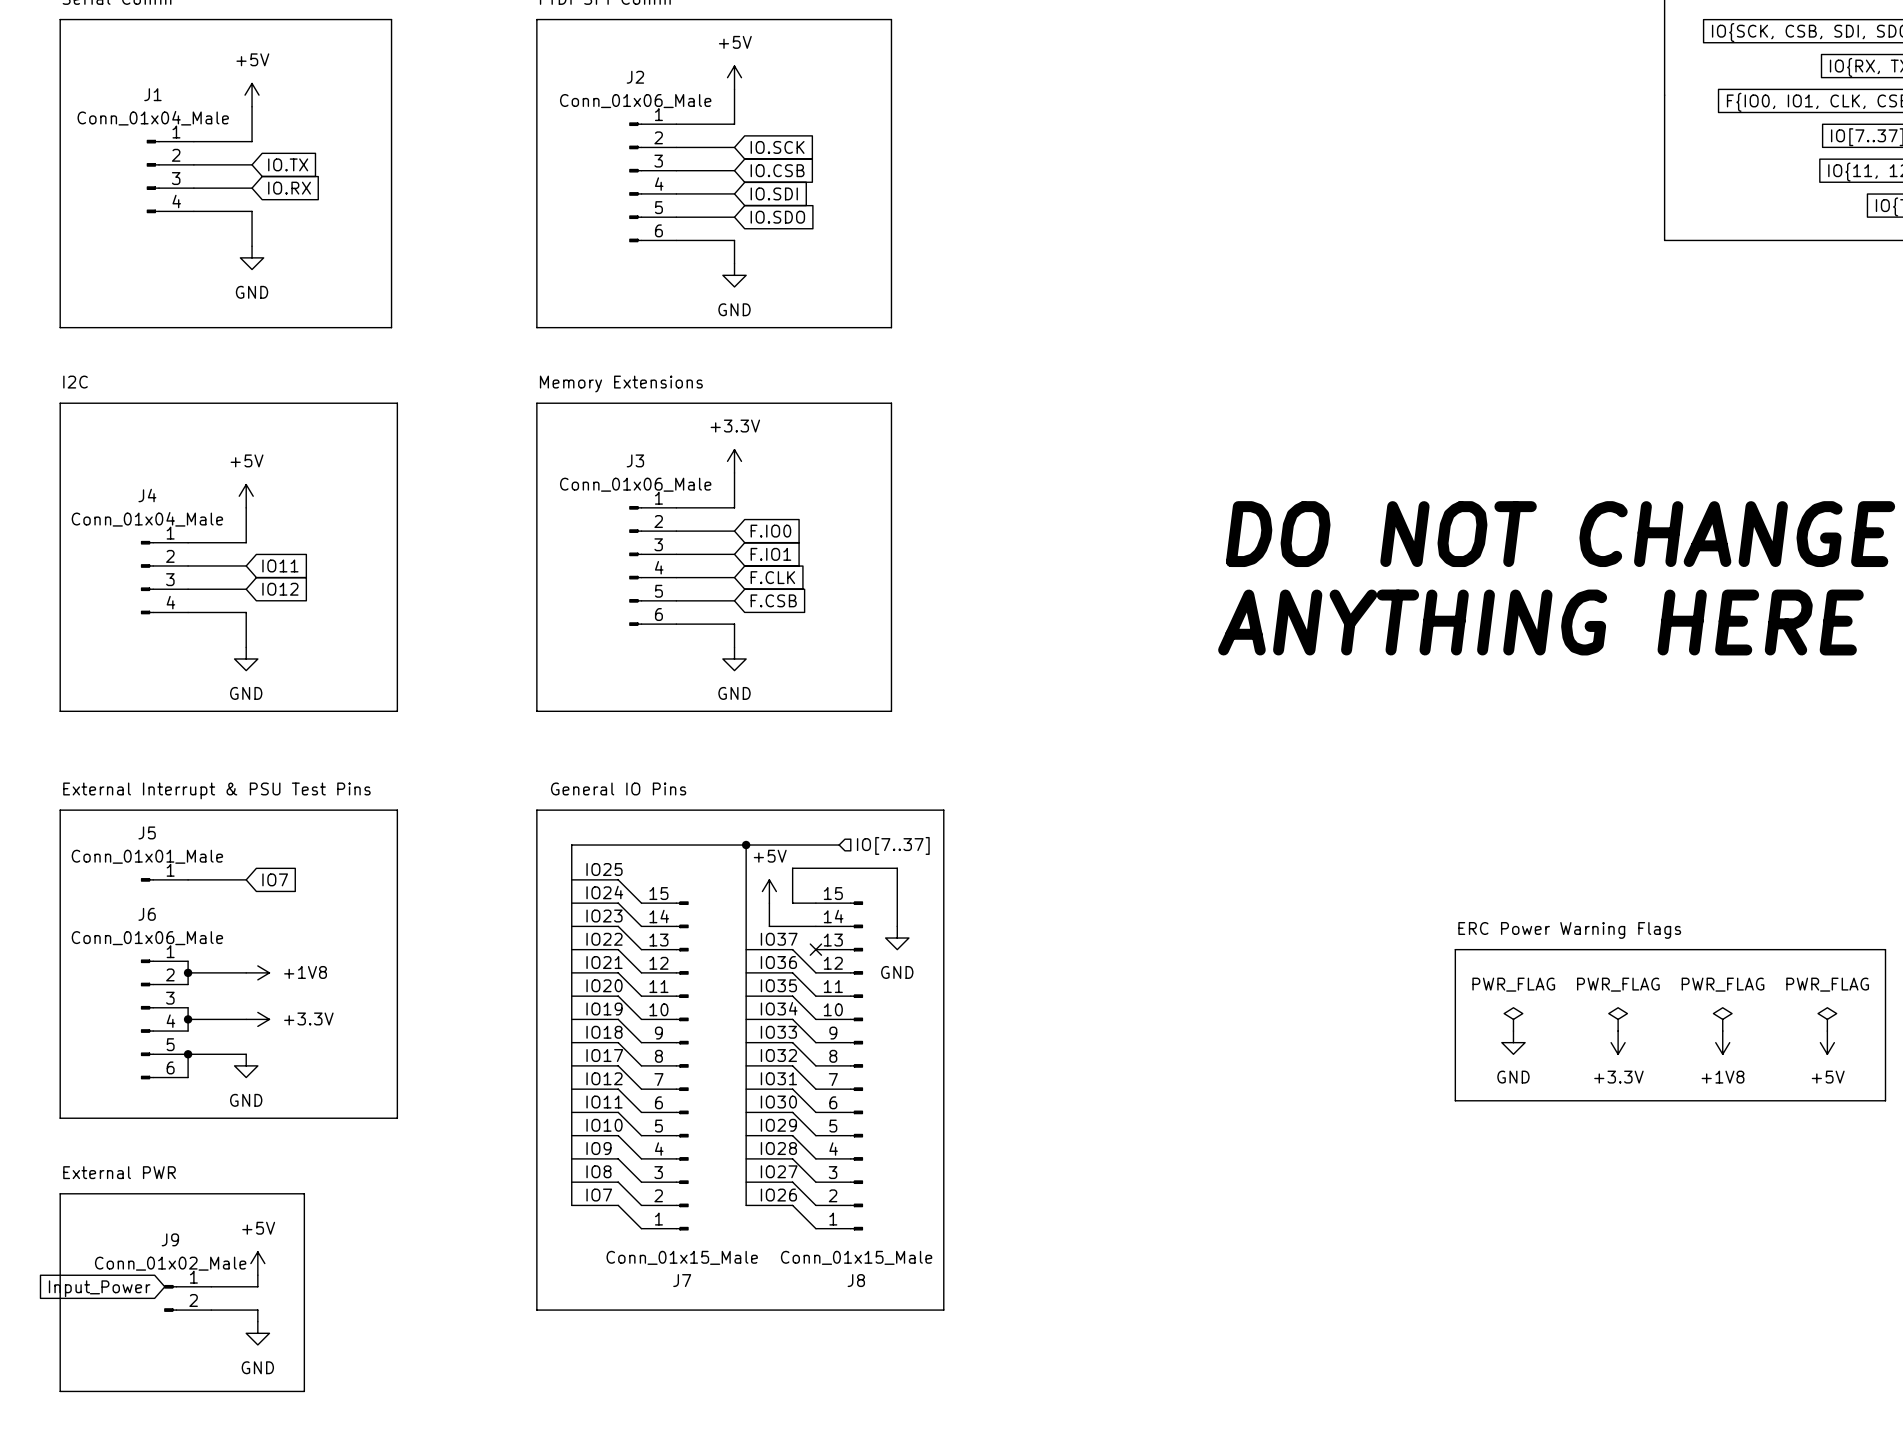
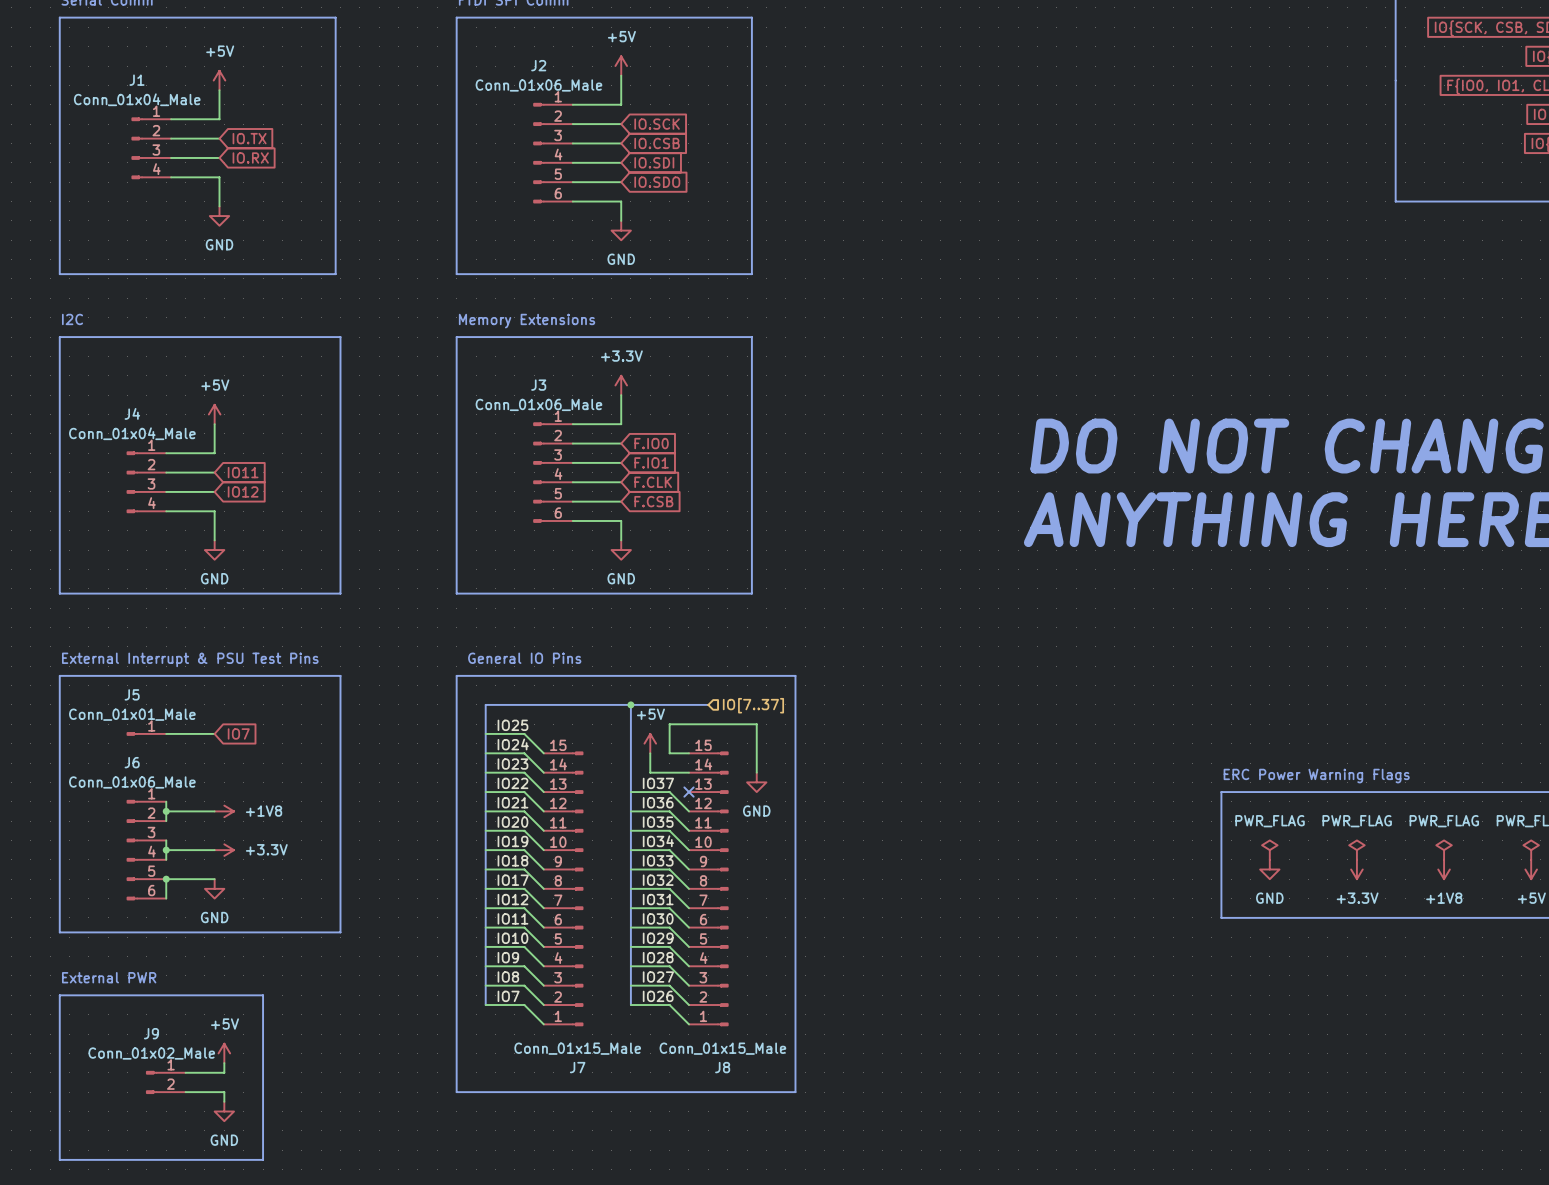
global label: Input_Power (99, 1288) -> none

